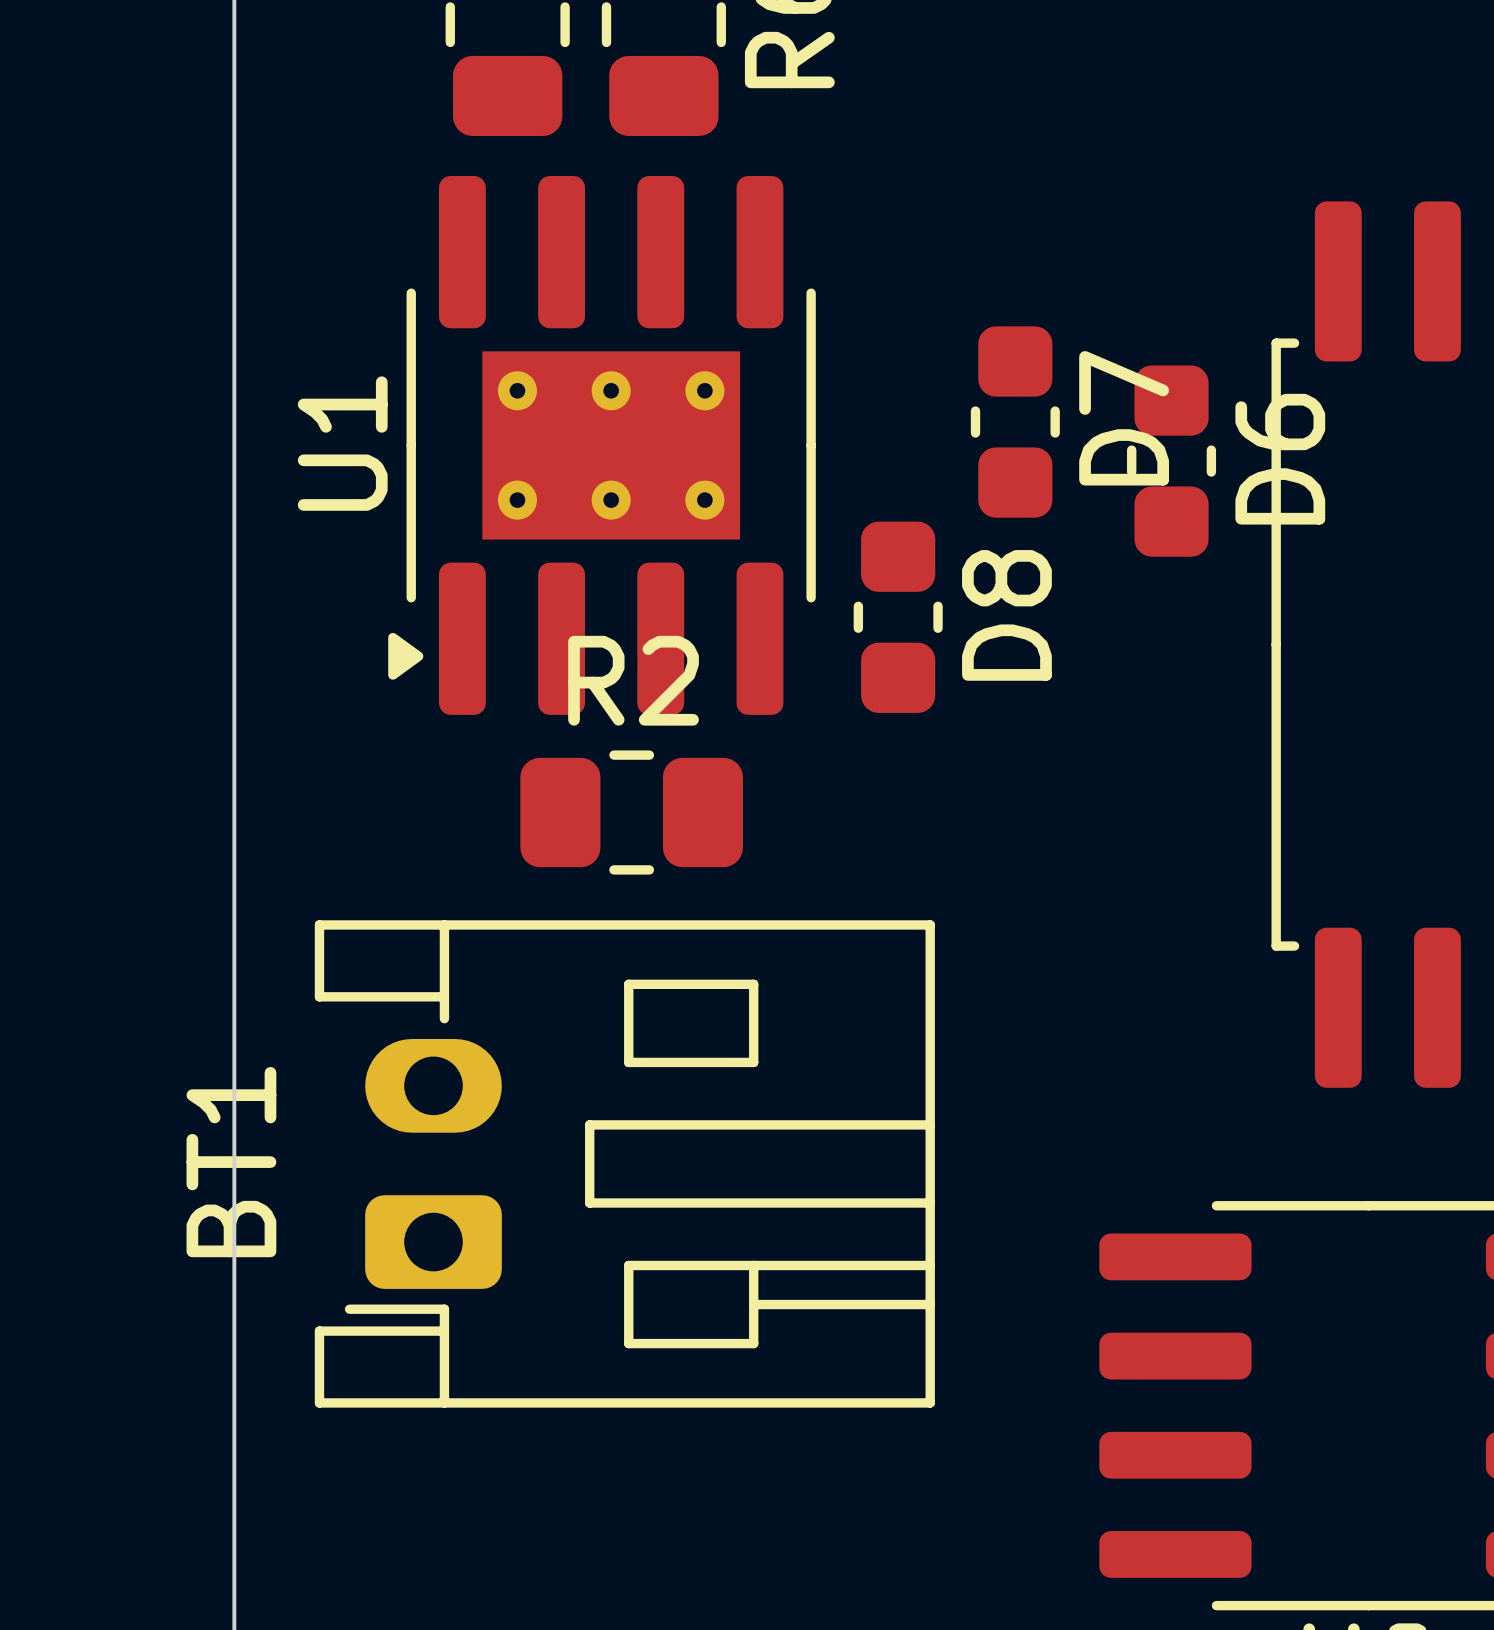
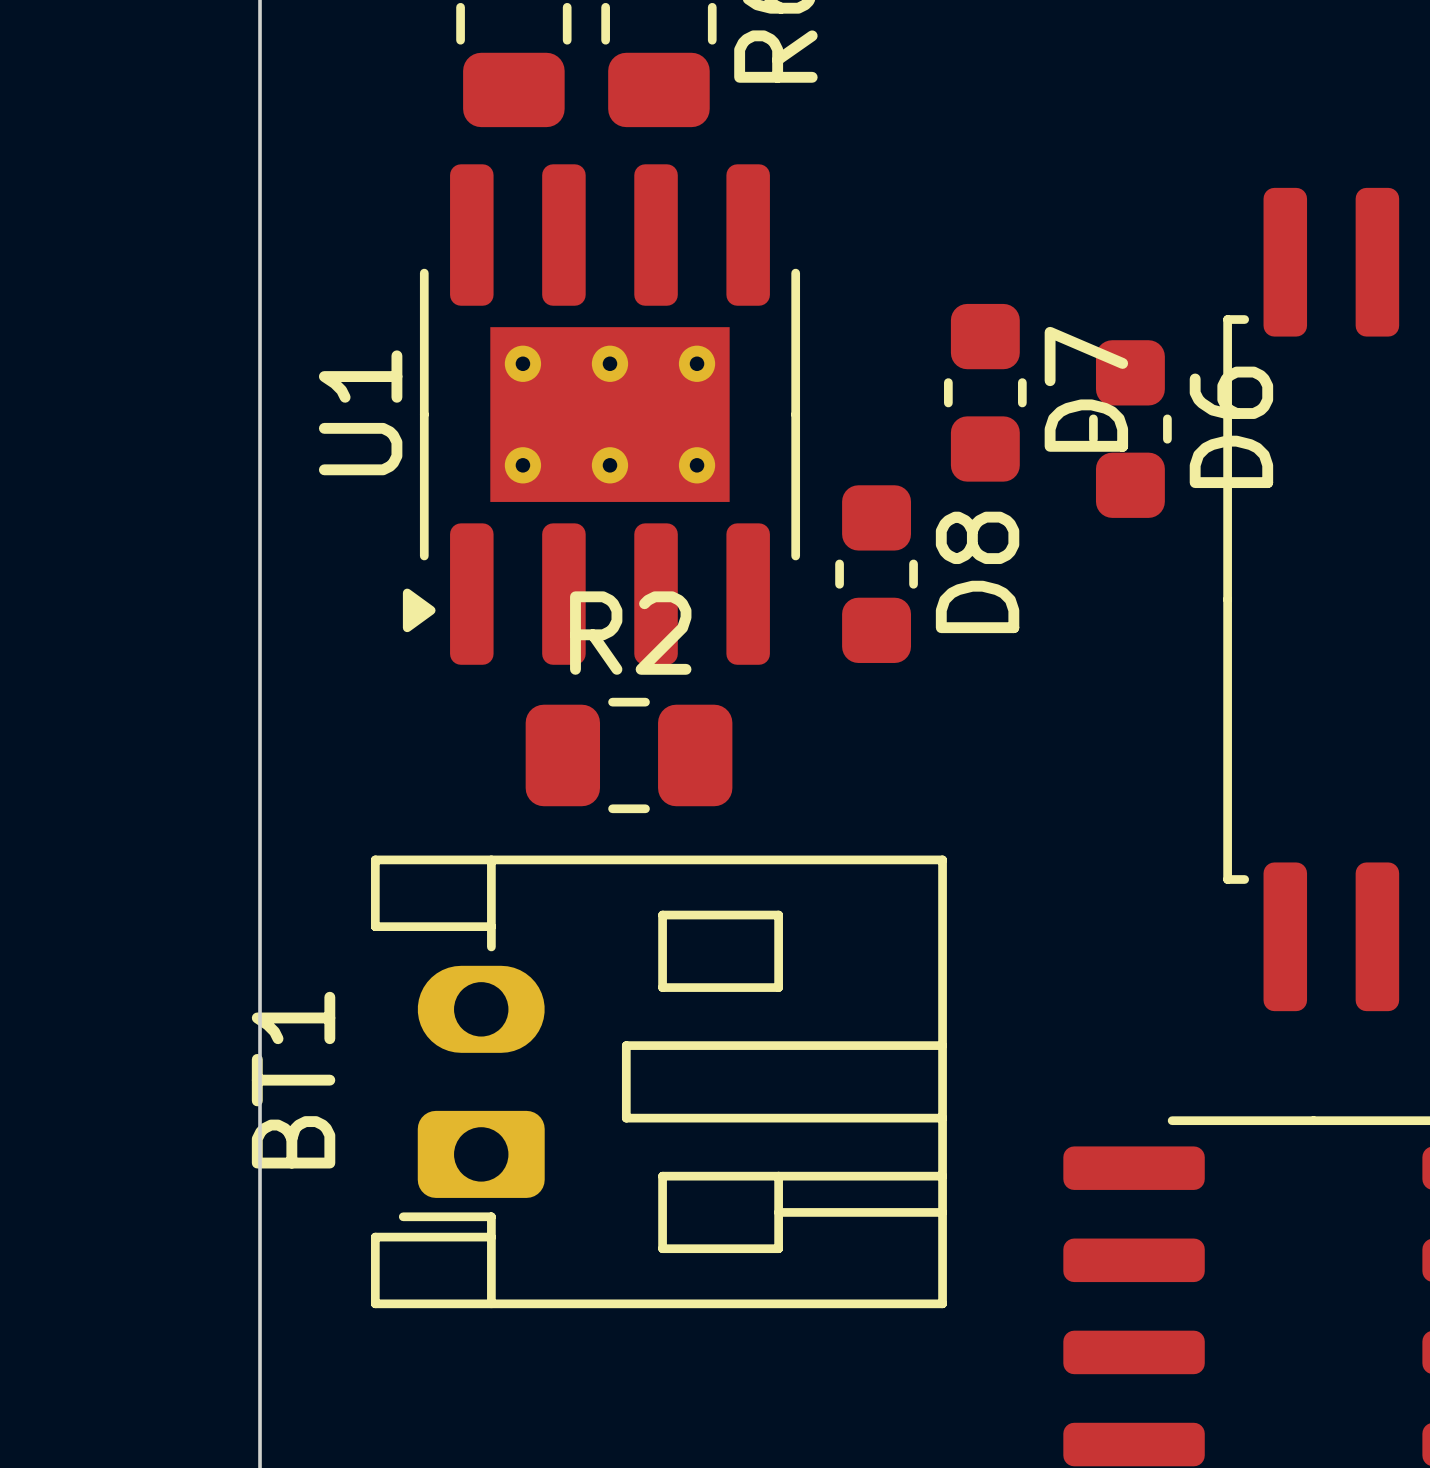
BT1 position: (624, 1163) -> (658, 1081)

